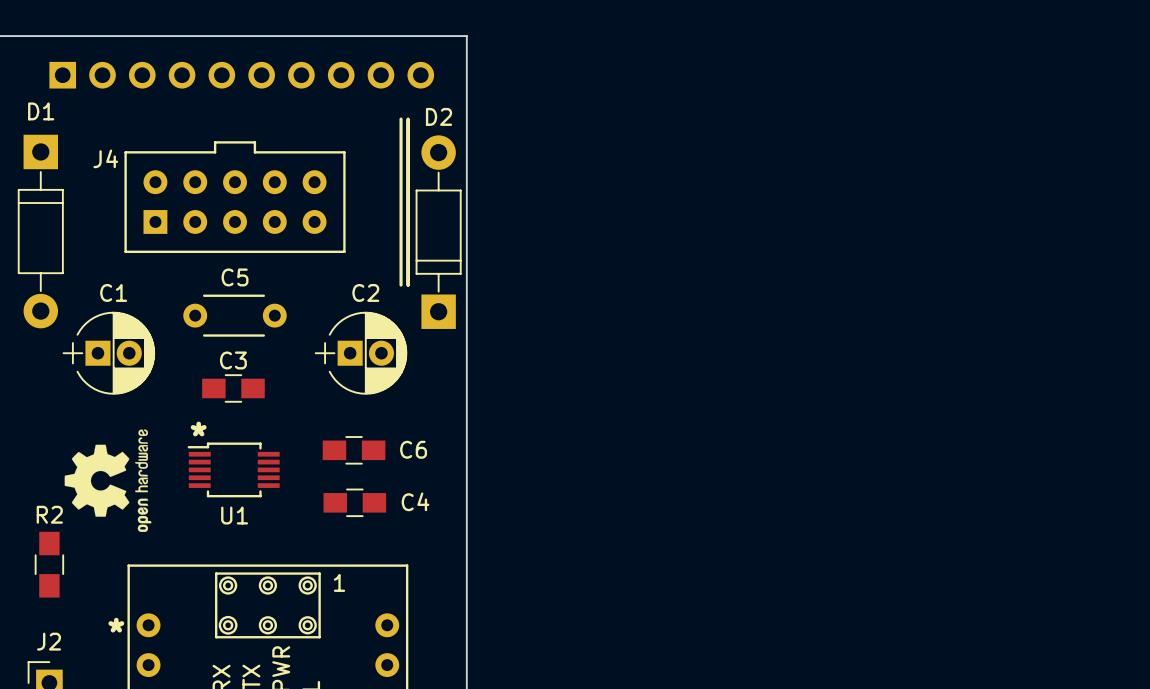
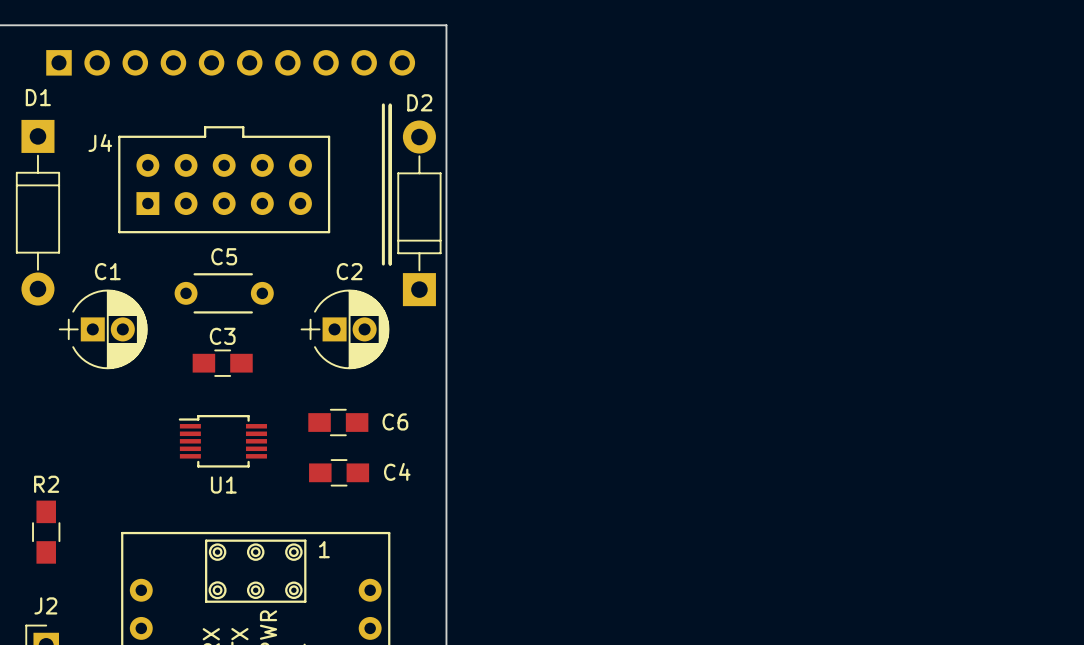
drawing: [64, 429, 152, 532] -> none
text: * (198, 429) -> none
text: * (116, 625) -> none

